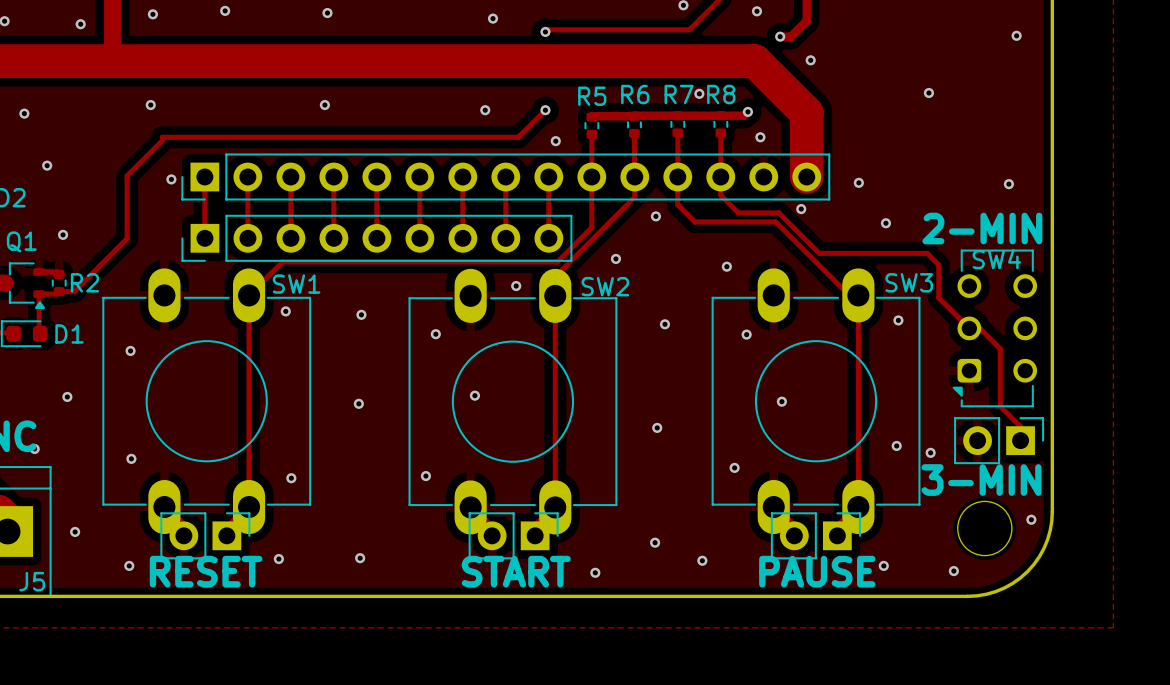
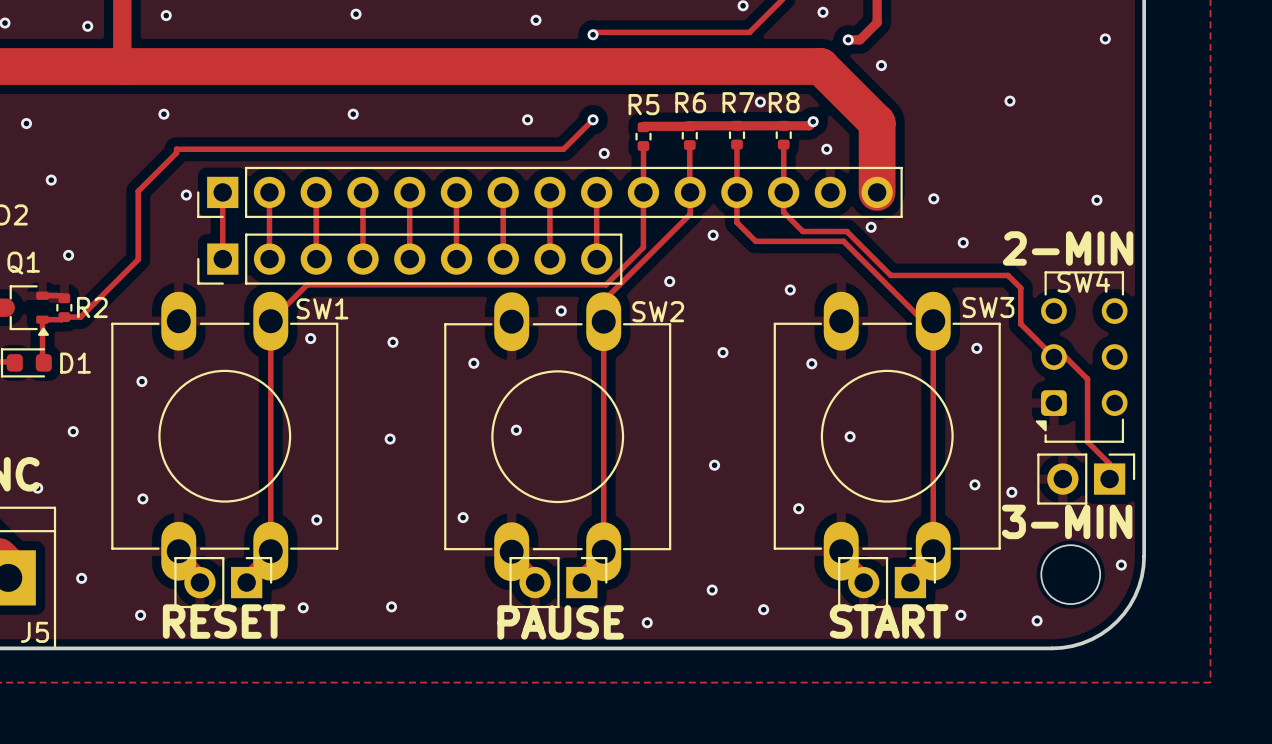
via: (225, 10) -> none
text: START (516, 571) -> PAUSE (560, 622)
text: PAUSE (817, 571) -> START (889, 621)

